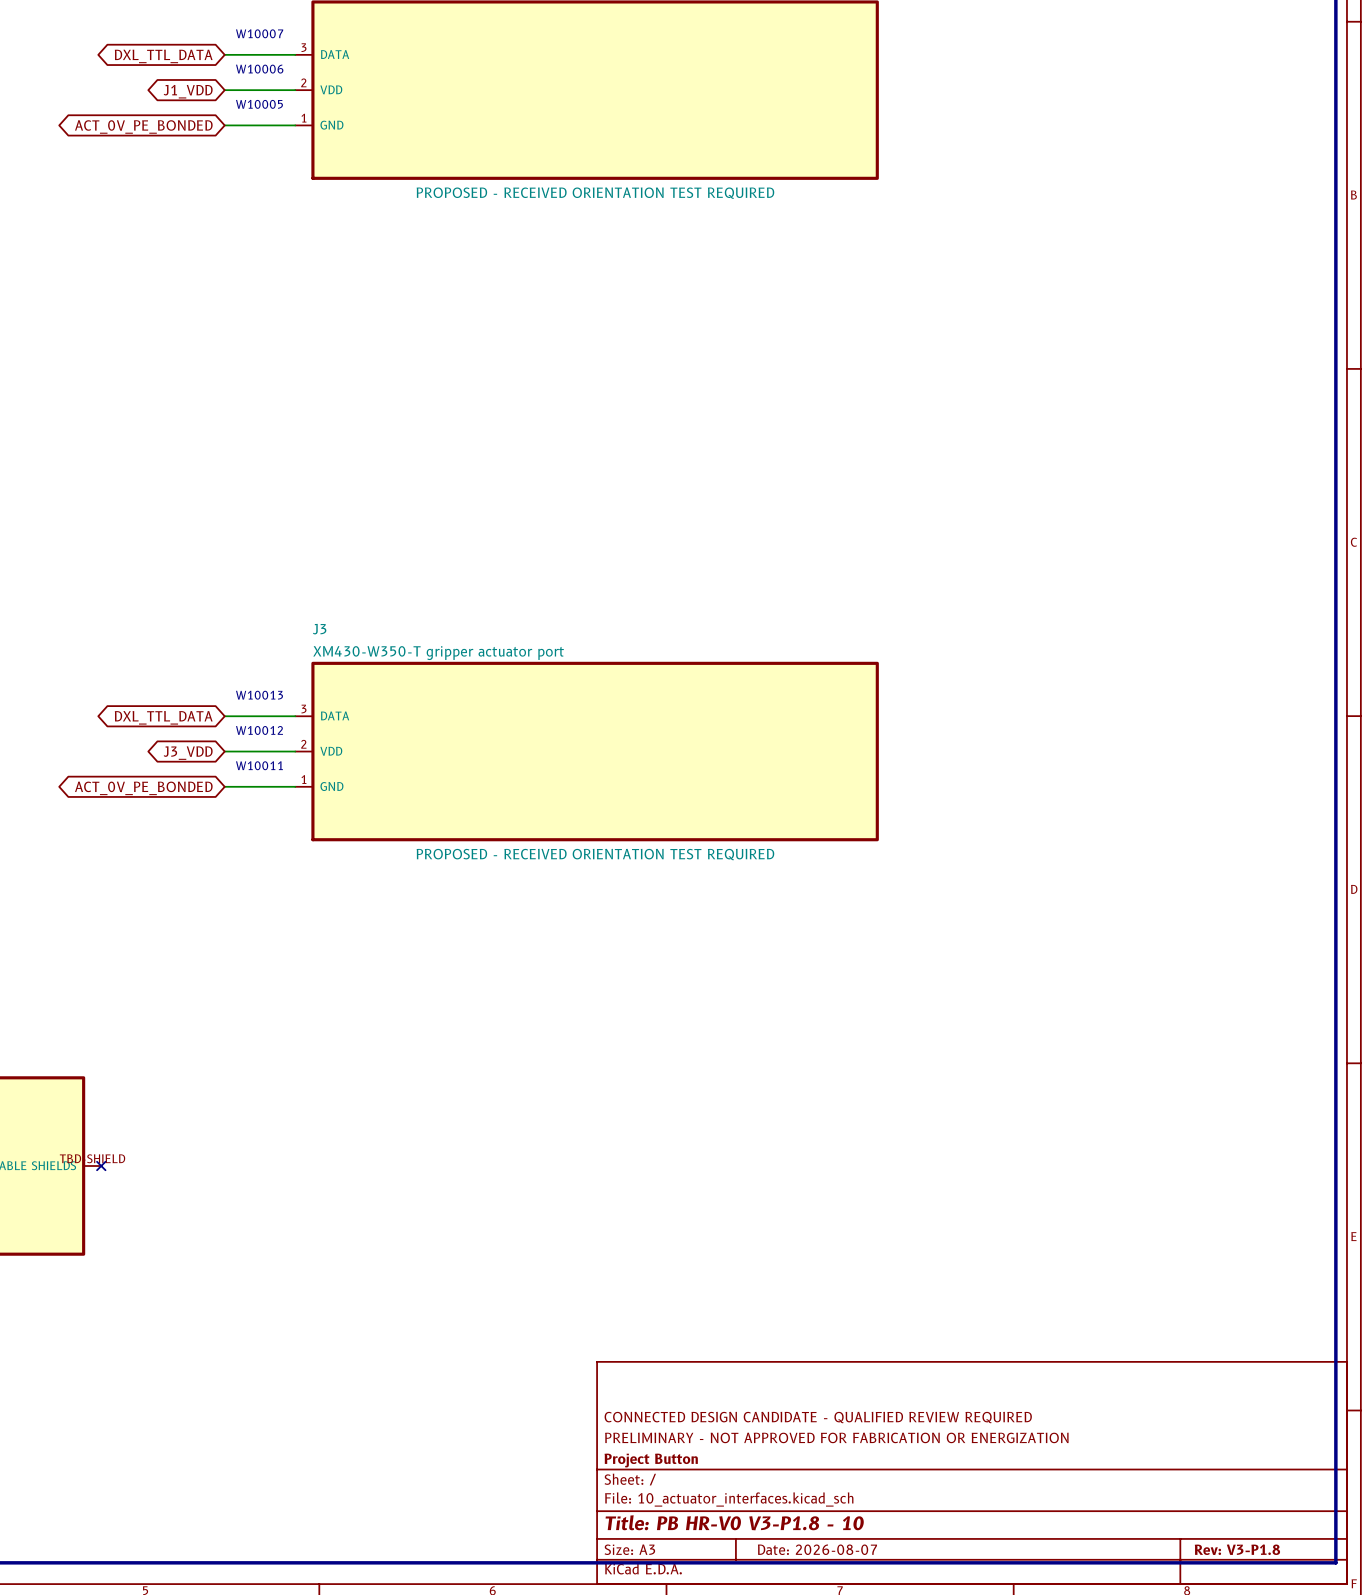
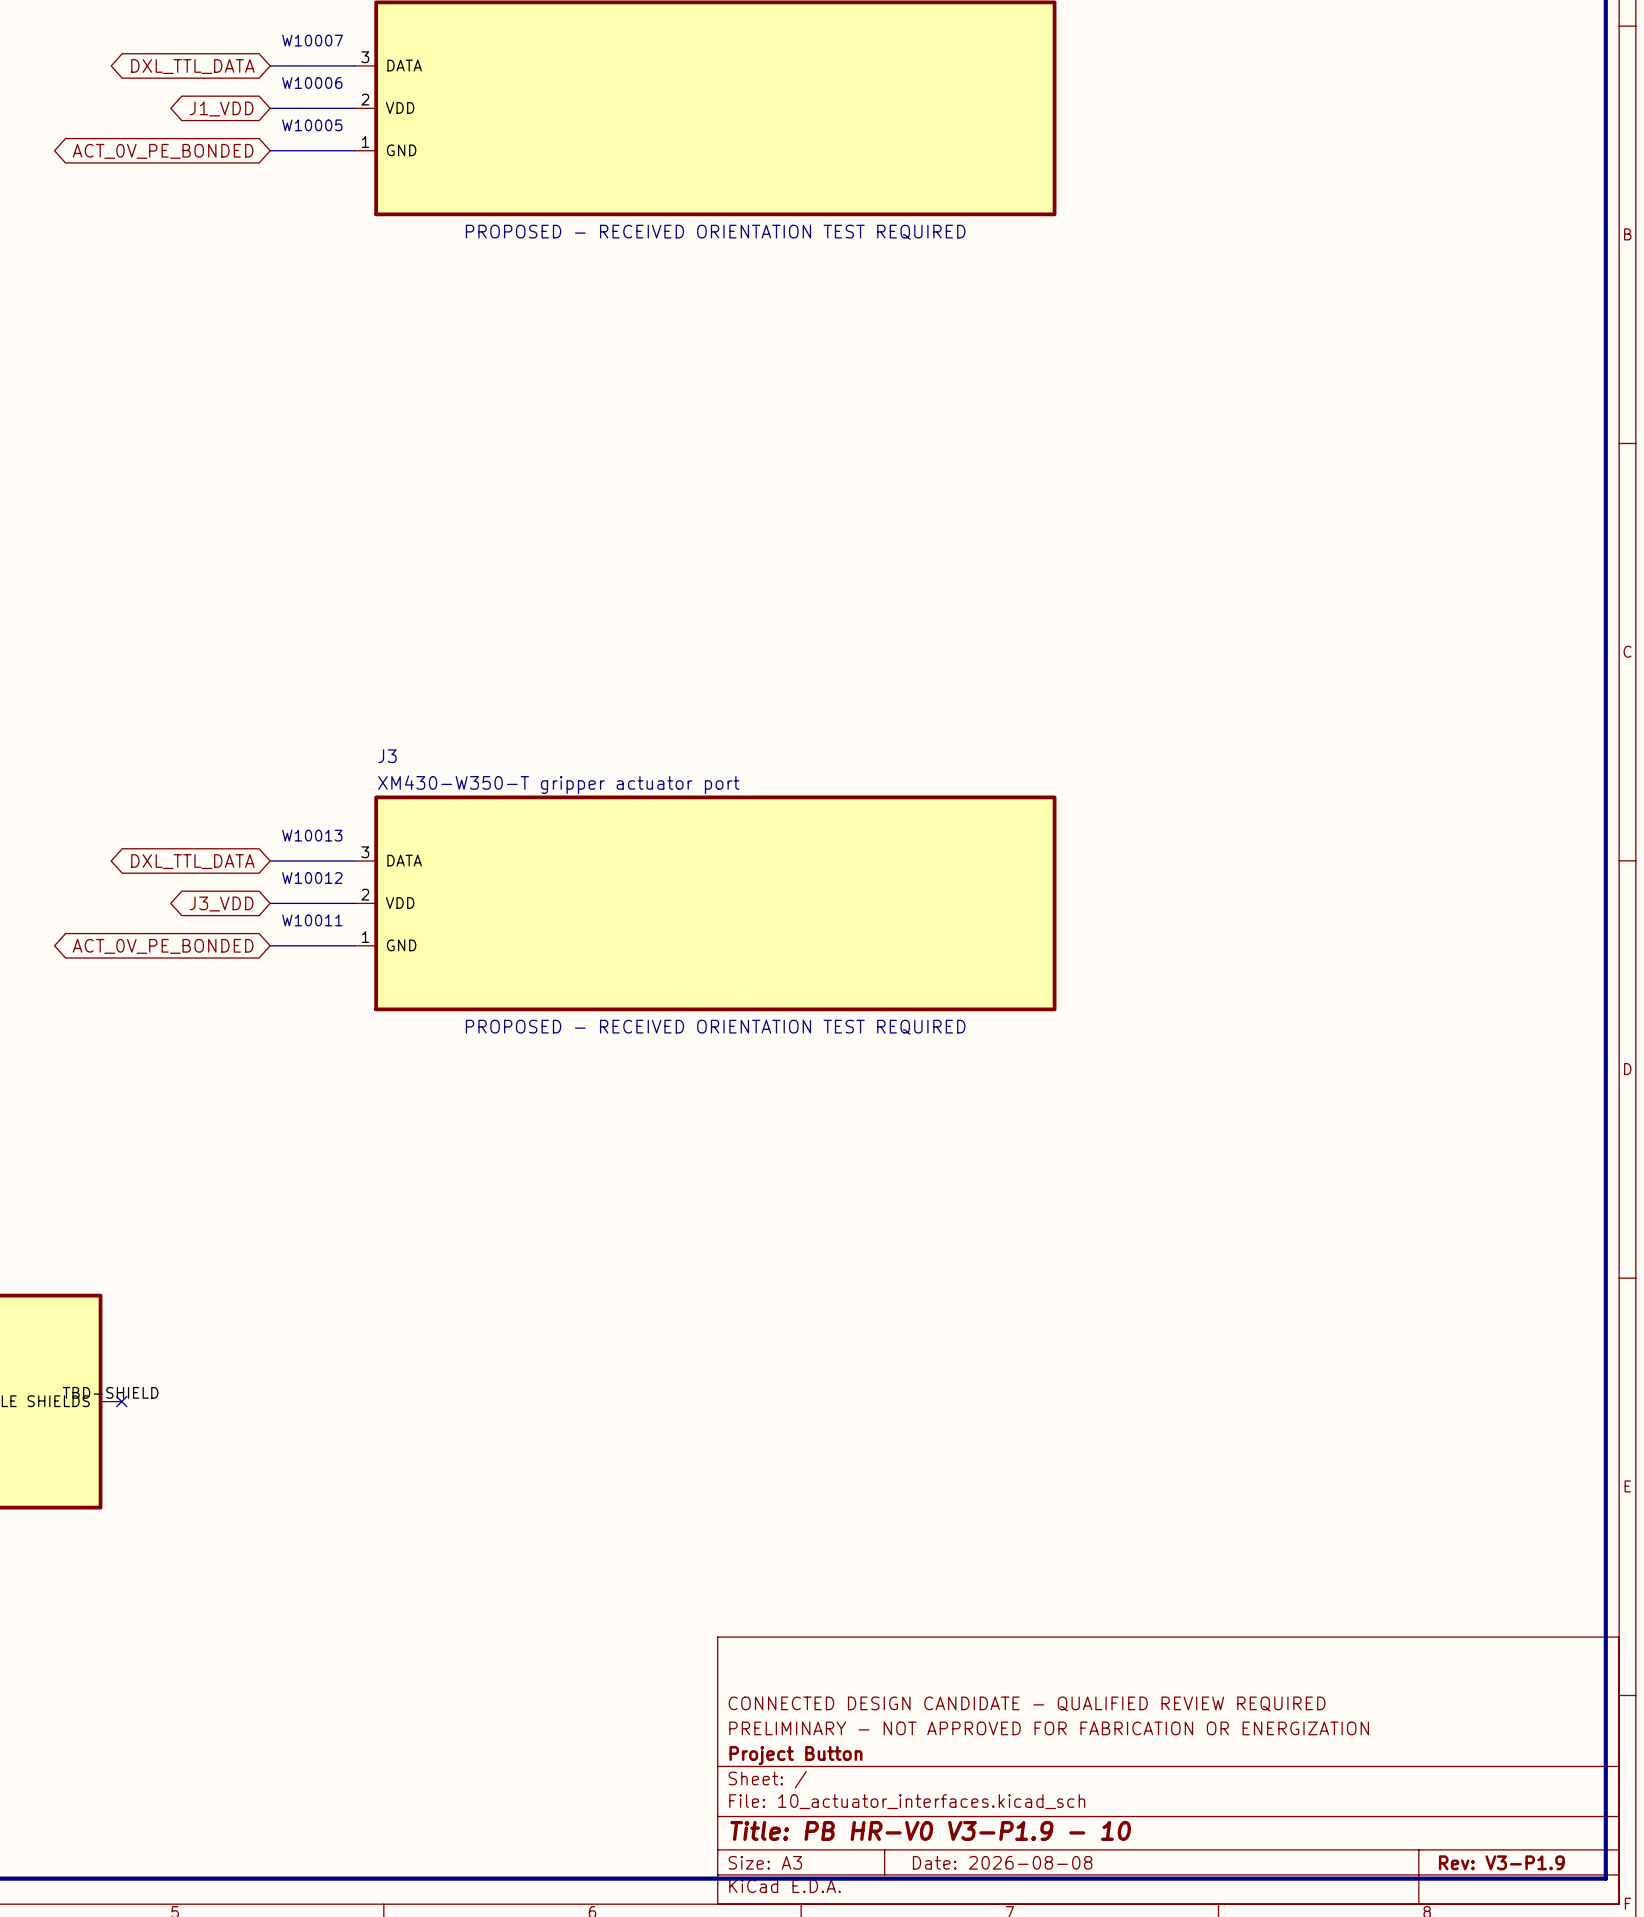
title block: Title: PB HR-V0 V3-P1.8 - 10 (734, 1522) -> Title: PB HR-V0 V3-P1.9 - 10 (930, 1830)
title block: Date: 2026-08-07 (817, 1549) -> Date: 2026-08-08 (1002, 1862)
title block: Rev: V3-P1.8 (1237, 1549) -> Rev: V3-P1.9 (1501, 1862)

